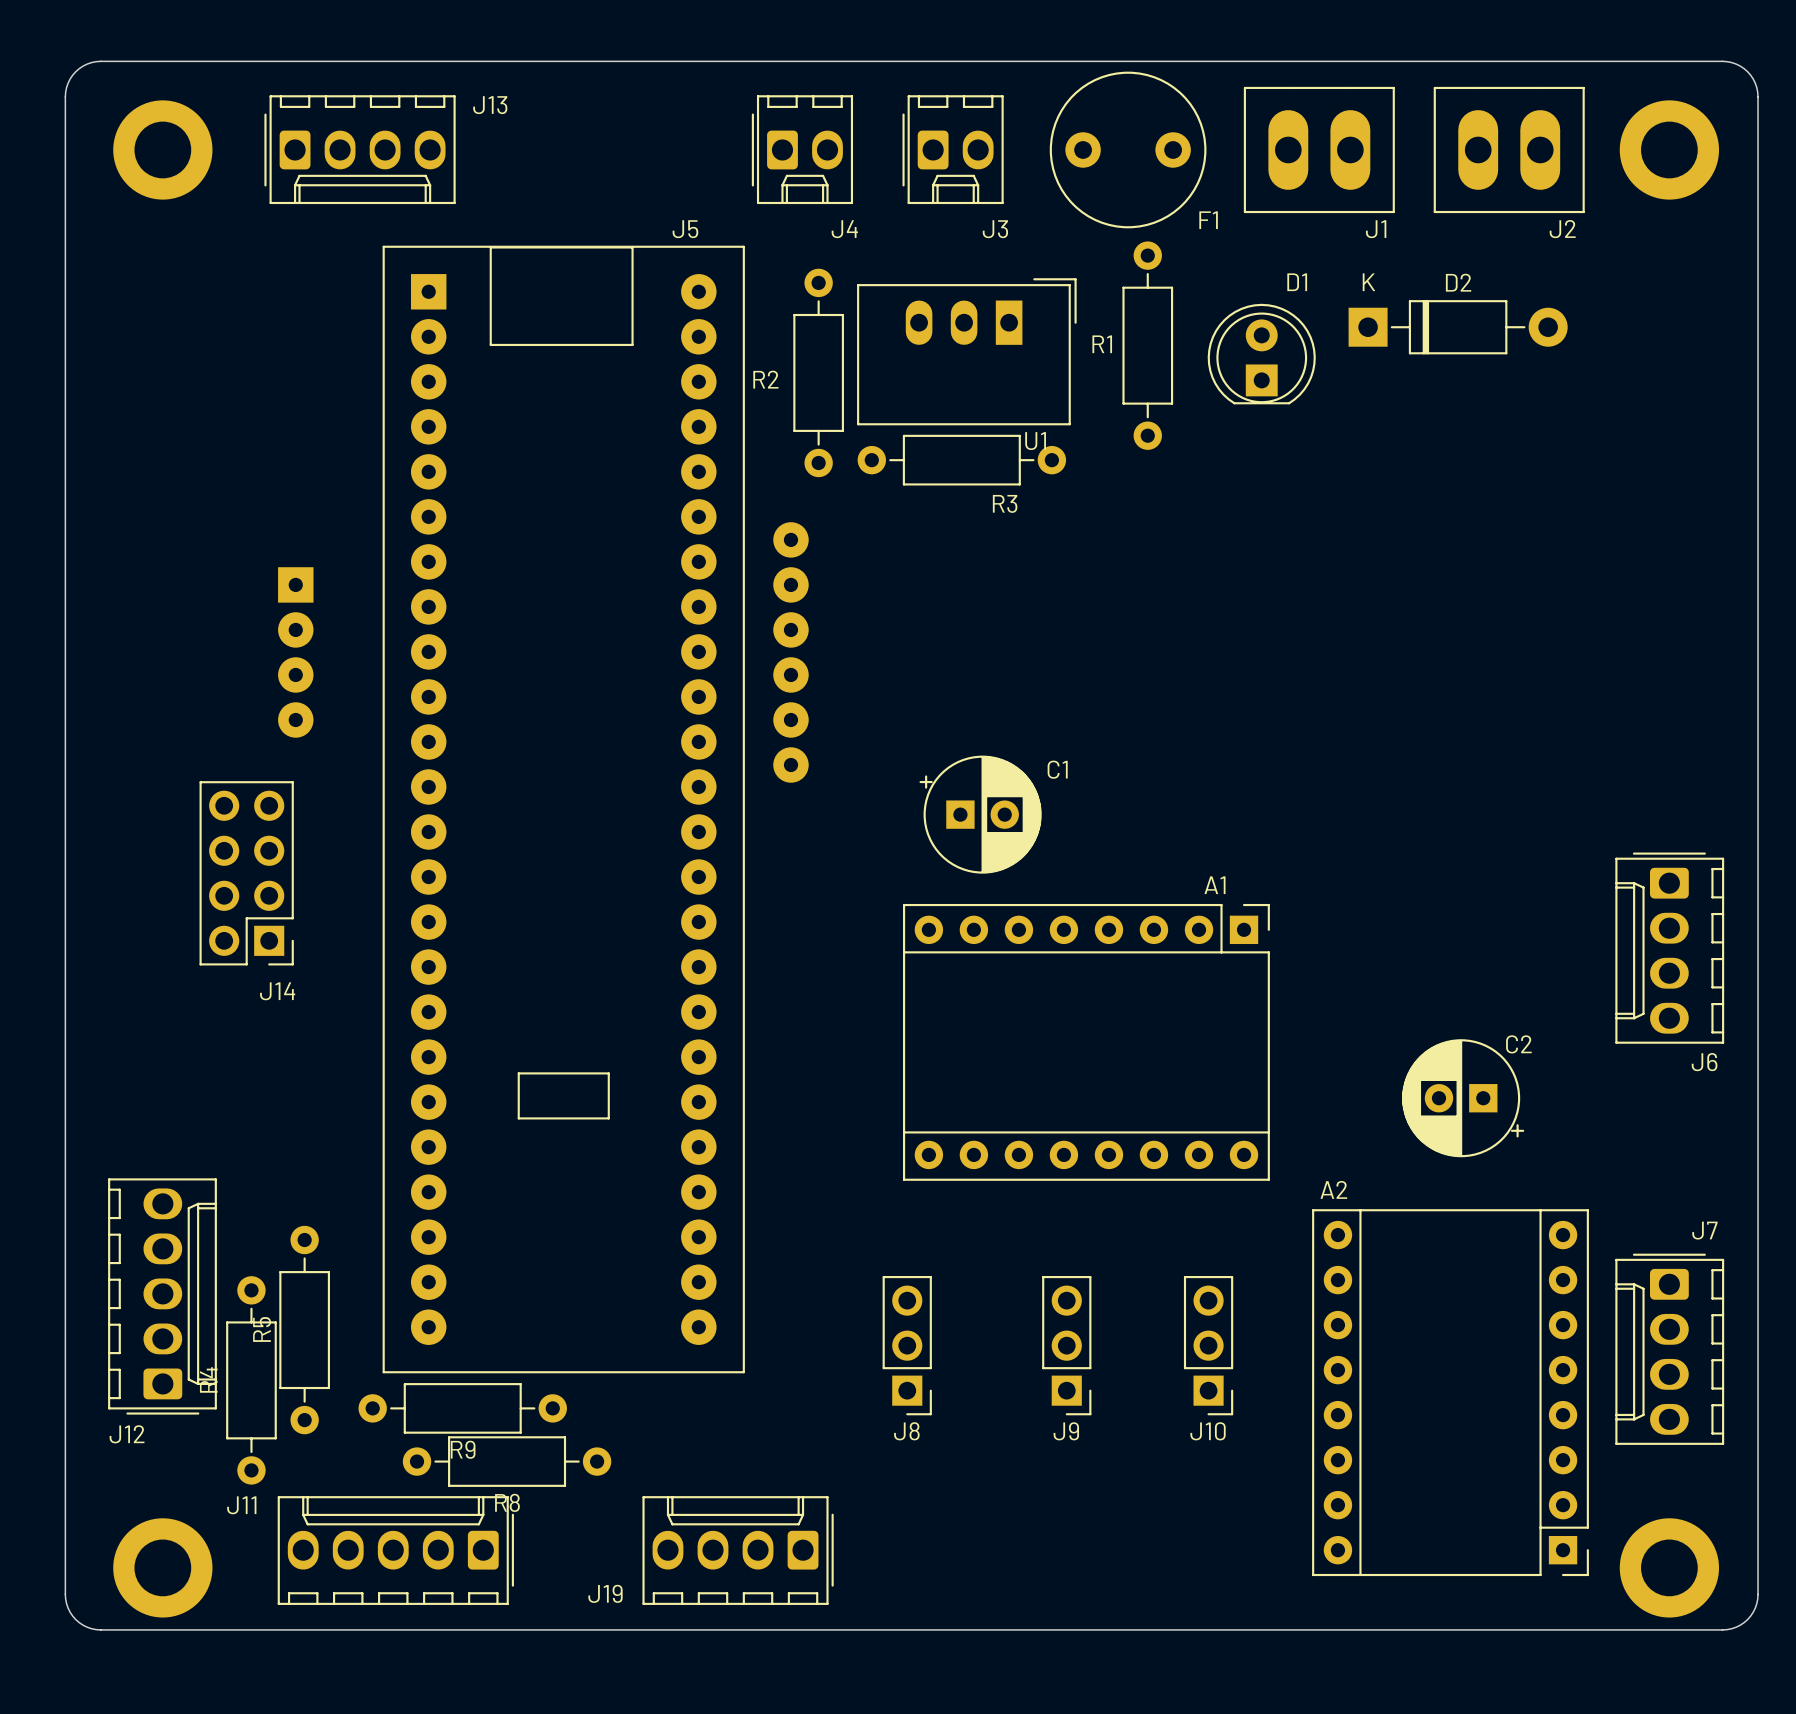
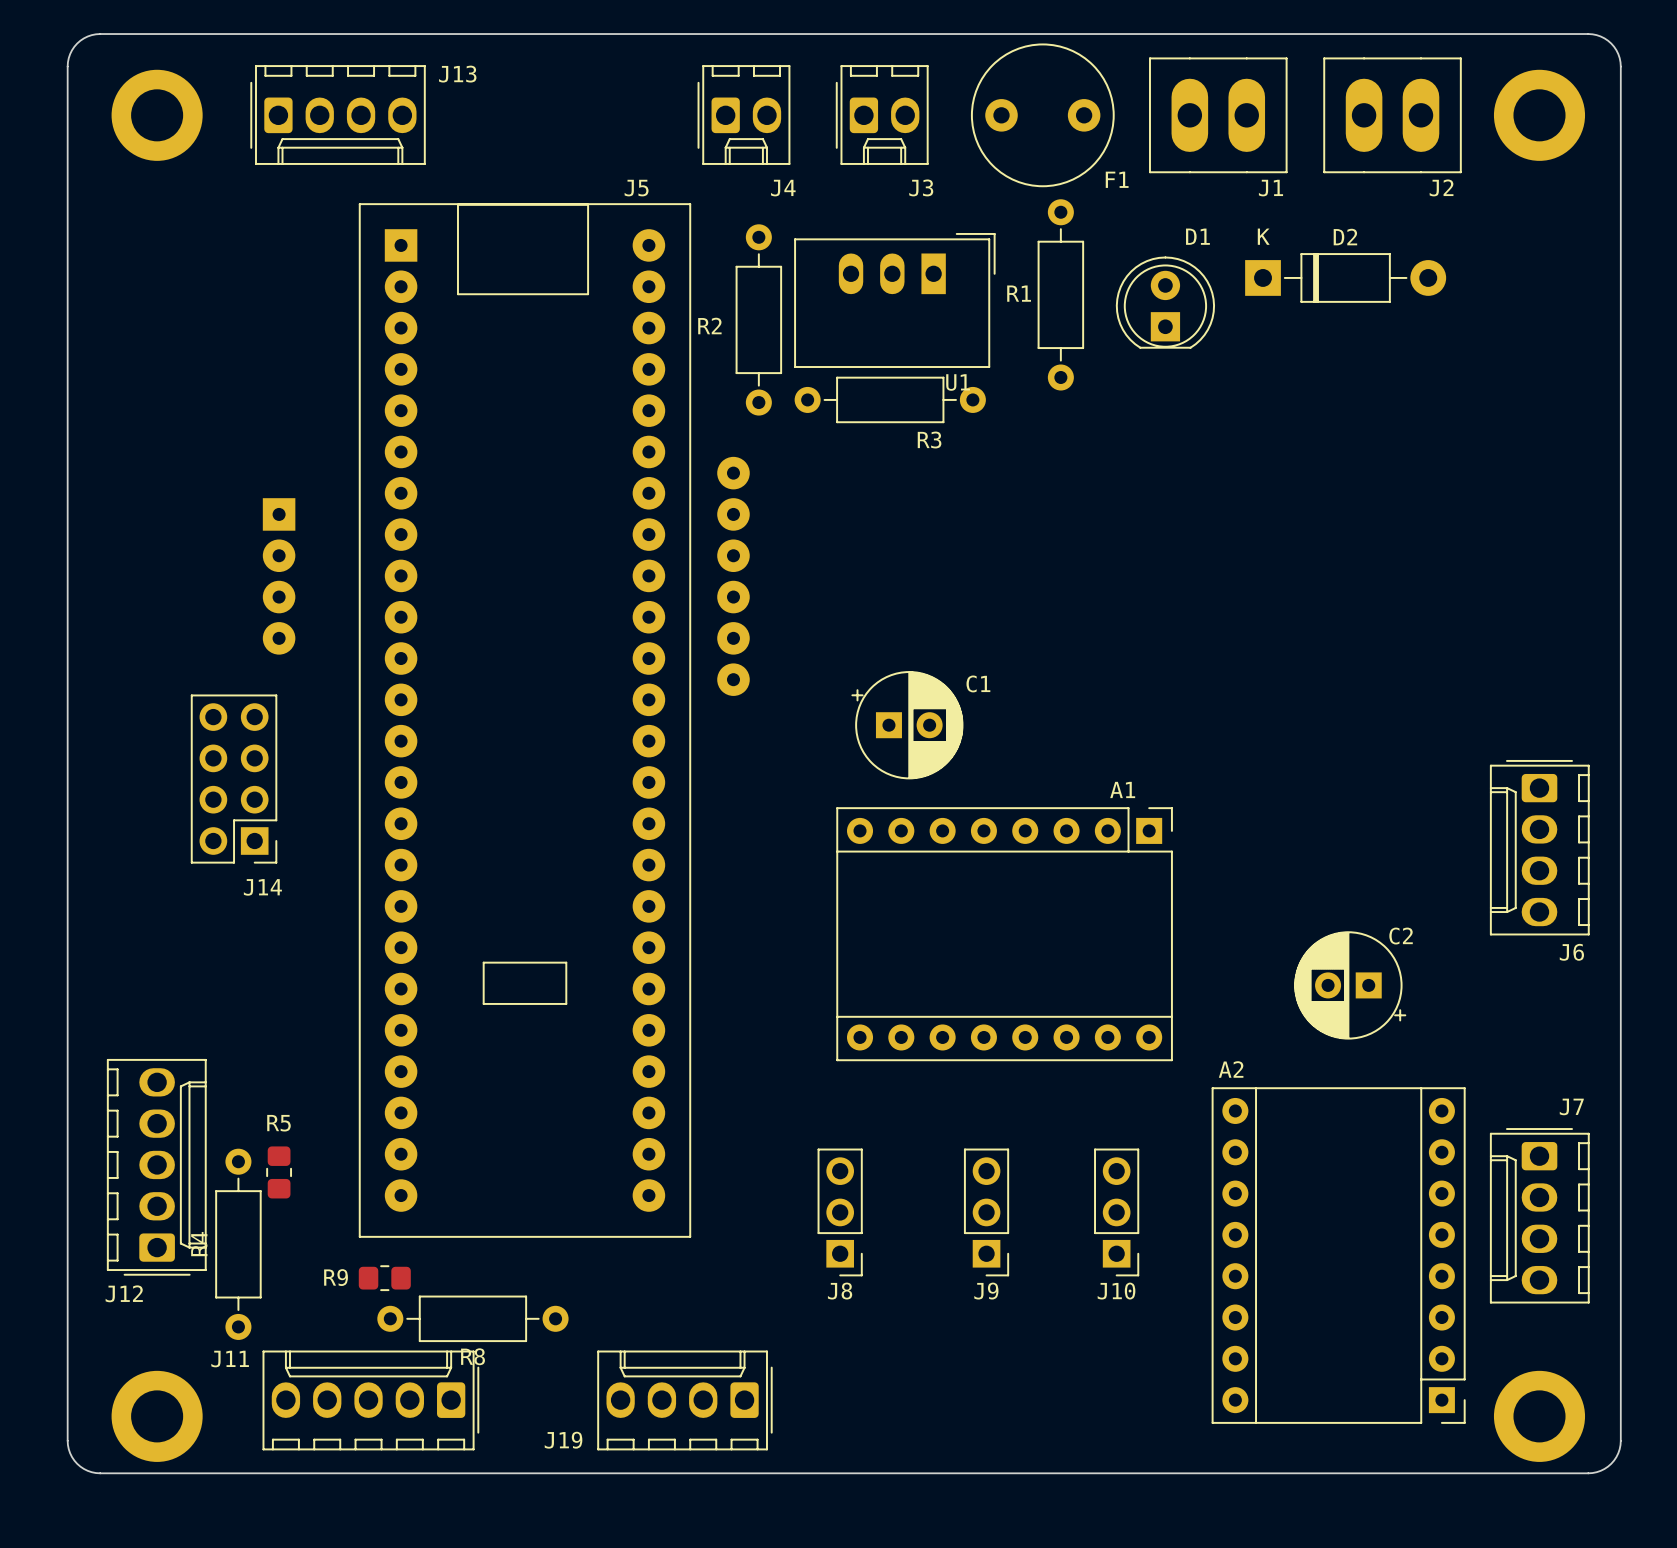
R5 footprint: [279, 1225, 330, 1435] -> [266, 1146, 293, 1199]
R5 name position: R5 (262, 1329) -> R5 (278, 1123)
R9 footprint: [358, 1383, 567, 1434] -> [358, 1265, 411, 1292]
R9 name position: R9 (463, 1449) -> R9 (336, 1277)

